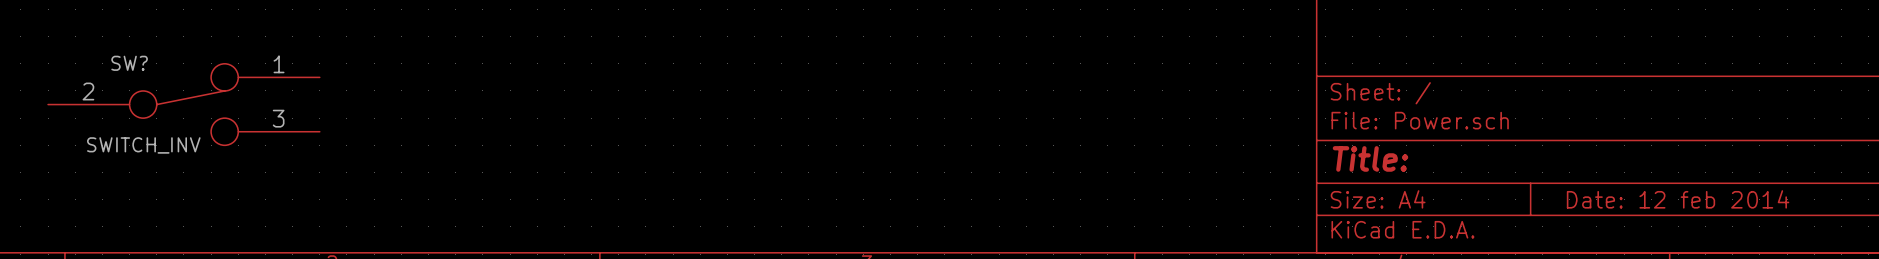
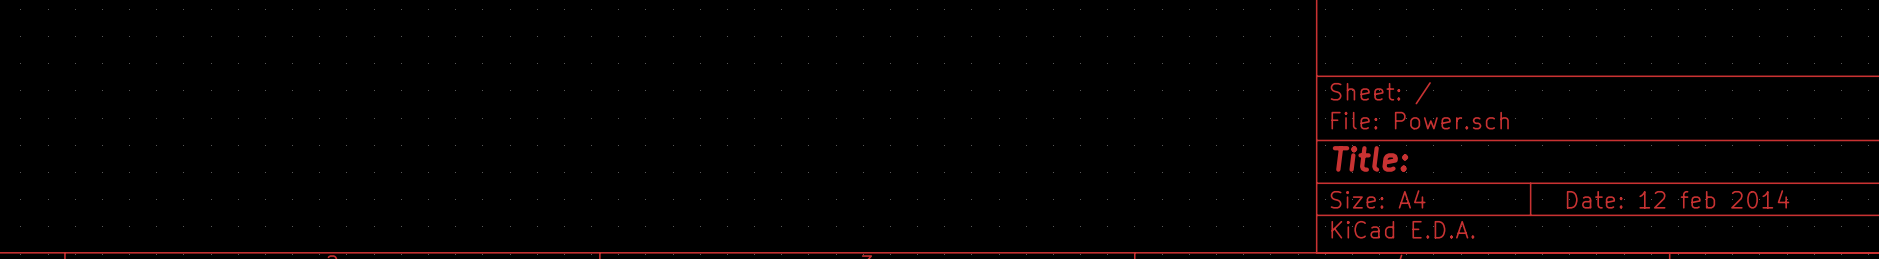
SW?: SWITCH_INV (183, 104) -> none

